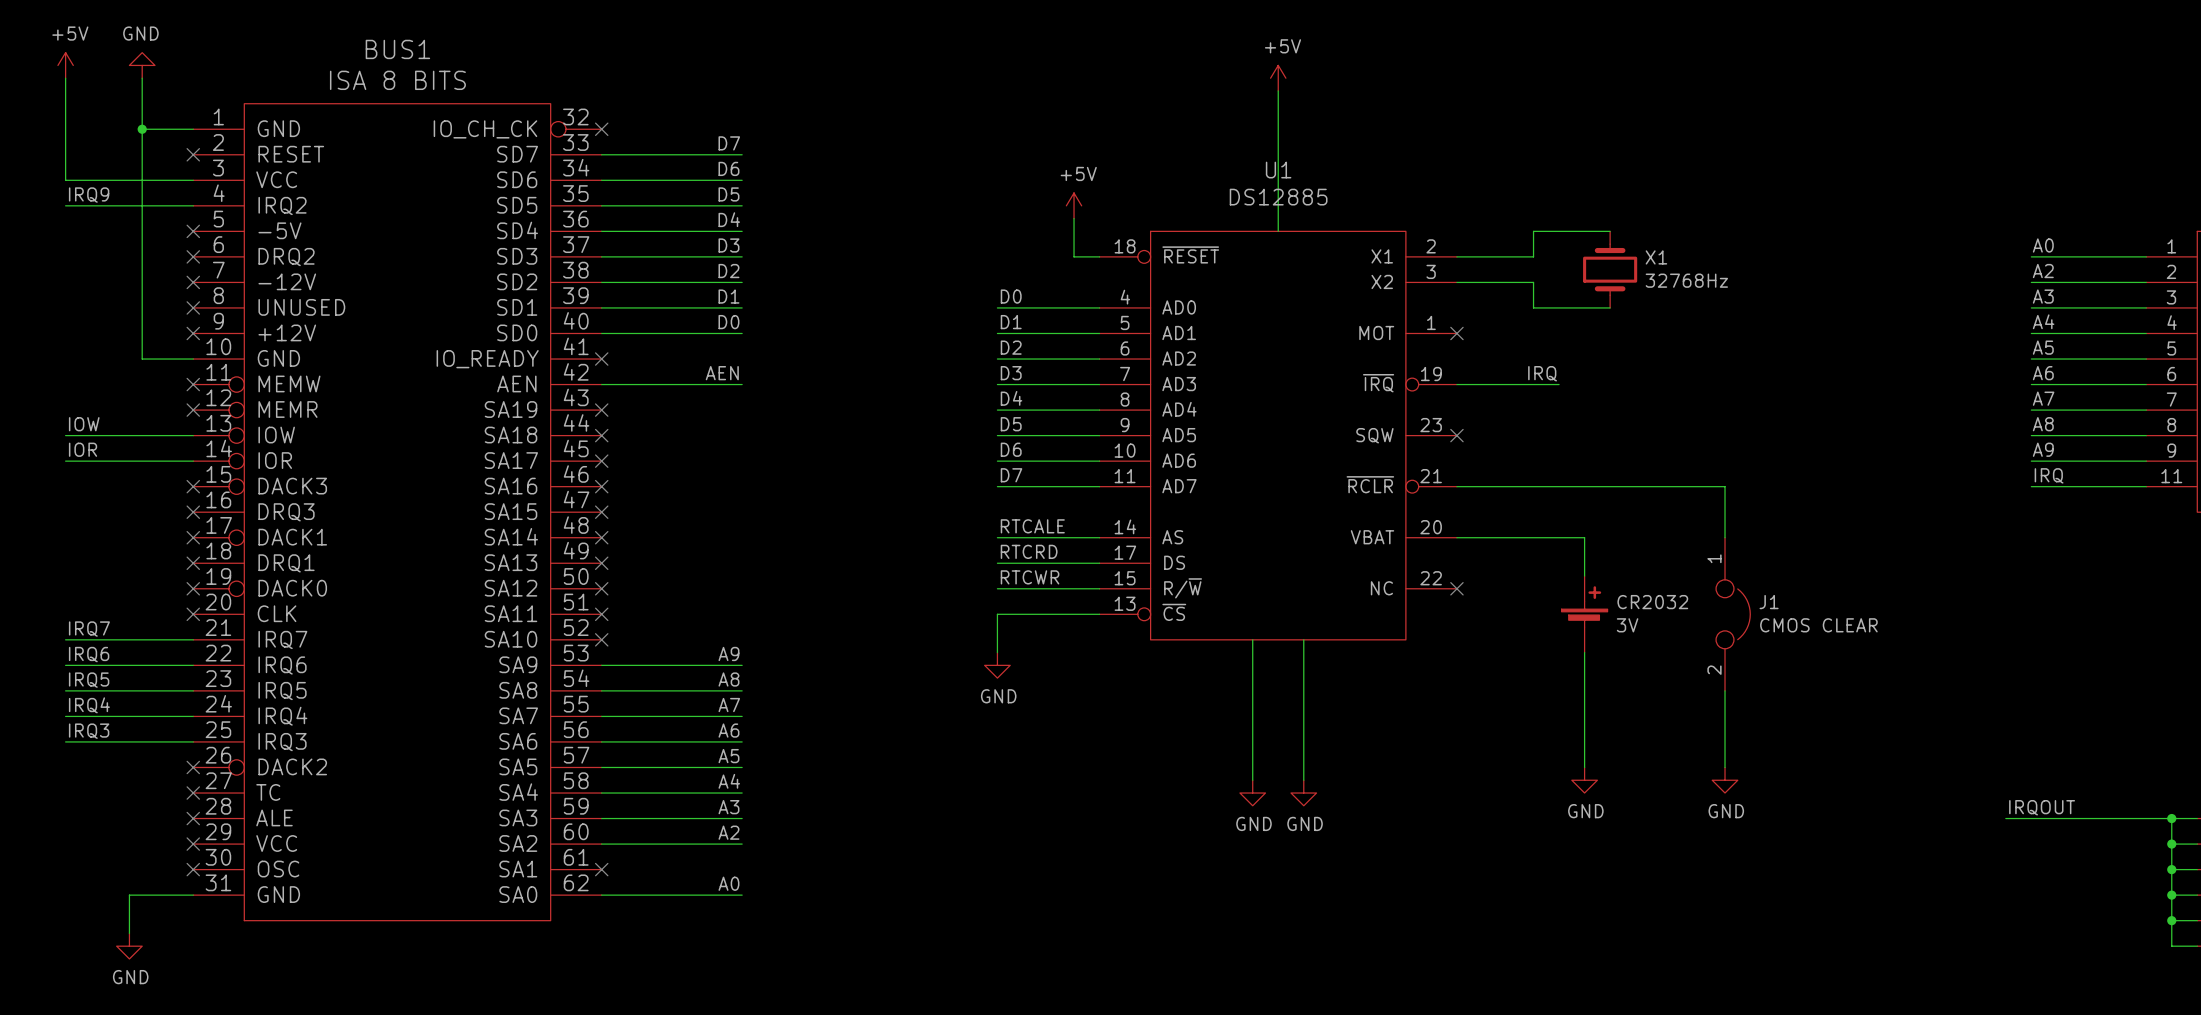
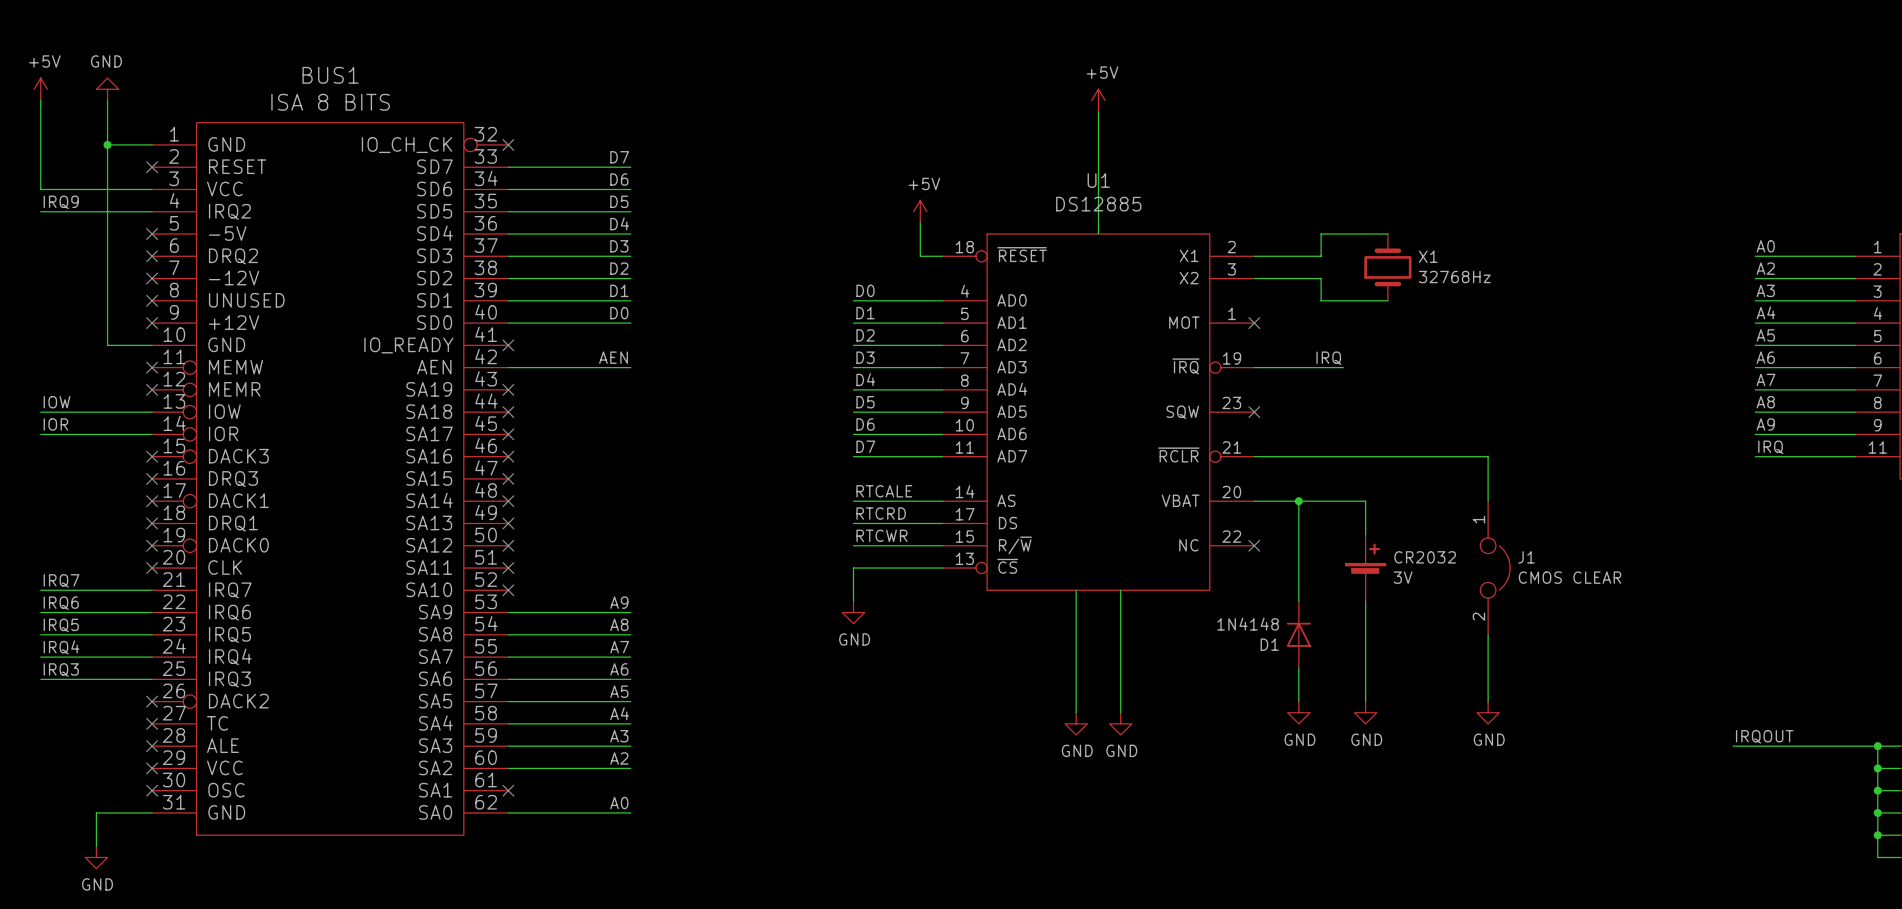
wire: none -> (1298, 501) (1298, 601)
junction: none -> (1298, 501)
D1: none -> 1N4148 (1298, 634)
wire: none -> (1298, 668) (1298, 701)
power symbol: none -> GND (1298, 712)

